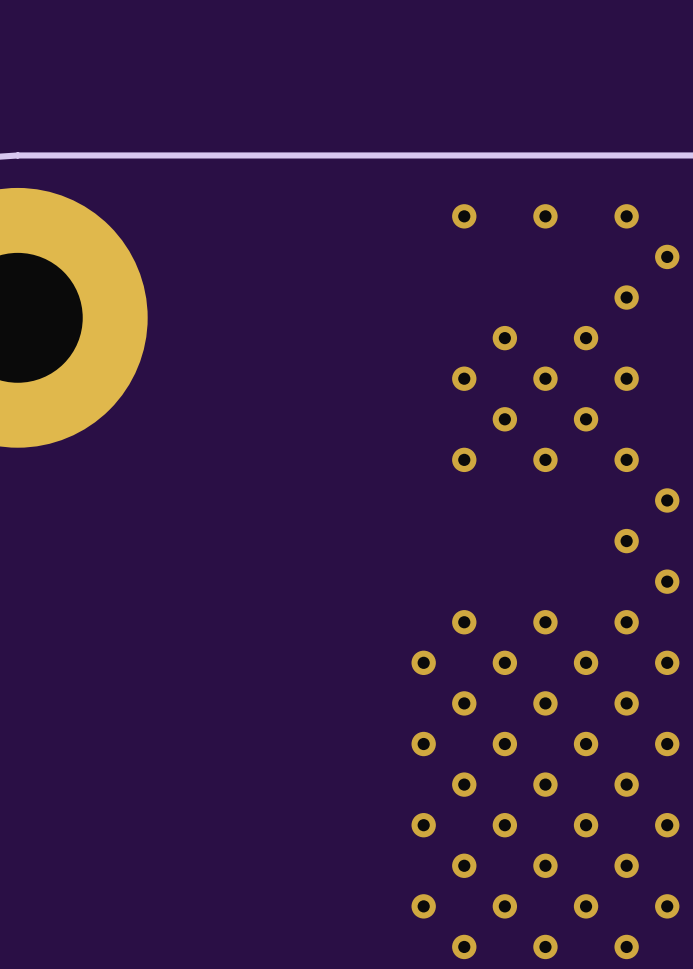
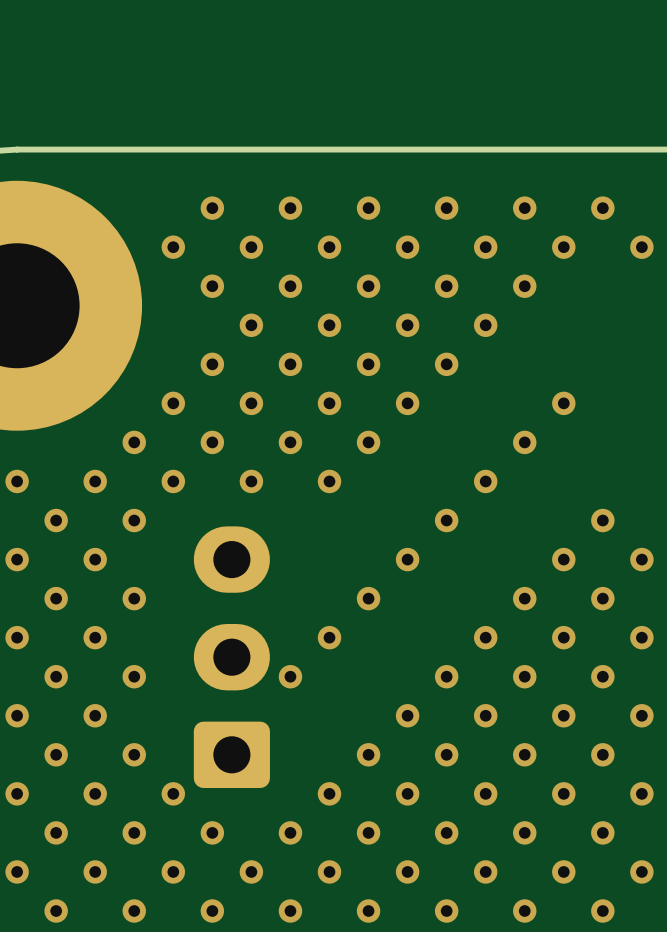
via: none -> (212, 208)
via: none -> (290, 208)
via: none -> (368, 208)
via: none -> (173, 247)
via: none -> (251, 247)
via: none -> (329, 247)
via: none -> (407, 247)
via: none -> (485, 247)
via: none -> (563, 247)
via: none -> (212, 286)
via: none -> (290, 286)
via: none -> (368, 286)
via: none -> (446, 286)
via: none -> (524, 286)
via: (626, 297) -> none
via: none -> (251, 325)
via: none -> (329, 325)
via: none -> (407, 325)
via: (586, 338) -> none
via: none -> (212, 364)
via: none -> (290, 364)
via: none -> (368, 364)
via: (545, 378) -> none
via: (626, 378) -> none
via: none -> (173, 403)
via: none -> (251, 403)
via: none -> (329, 403)
via: none -> (407, 403)
via: (504, 419) -> none
via: none -> (134, 442)
via: none -> (212, 442)
via: none -> (290, 442)
via: none -> (368, 442)
via: (464, 459) -> none
via: (626, 459) -> none
via: none -> (17, 481)
via: none -> (95, 481)
via: none -> (173, 481)
via: none -> (251, 481)
via: none -> (329, 481)
via: none -> (485, 481)
via: (667, 500) -> none
via: none -> (56, 520)
via: none -> (134, 520)
via: none -> (446, 520)
via: none -> (17, 559)
via: none -> (95, 559)
via: none -> (407, 559)
via: none -> (563, 559)
via: none -> (56, 598)
via: none -> (134, 598)
via: none -> (368, 598)
via: (464, 622) -> none
via: none -> (17, 637)
via: none -> (95, 637)
via: none -> (329, 637)
via: (423, 662) -> none
part: none -> (231, 657)
via: none -> (56, 676)
via: none -> (134, 676)
via: none -> (290, 676)
via: none -> (17, 715)
via: none -> (95, 715)
via: none -> (56, 754)
via: none -> (134, 754)
via: none -> (368, 754)
via: none -> (17, 793)
via: none -> (95, 793)
via: none -> (173, 793)
via: none -> (329, 793)
via: none -> (56, 832)
via: none -> (134, 832)
via: none -> (212, 832)
via: none -> (290, 832)
via: none -> (368, 832)
via: none -> (17, 871)
via: none -> (95, 871)
via: none -> (173, 871)
via: none -> (251, 871)
via: none -> (329, 871)
via: none -> (56, 911)
via: none -> (134, 911)
via: none -> (212, 911)
via: none -> (290, 911)
via: none -> (368, 911)

